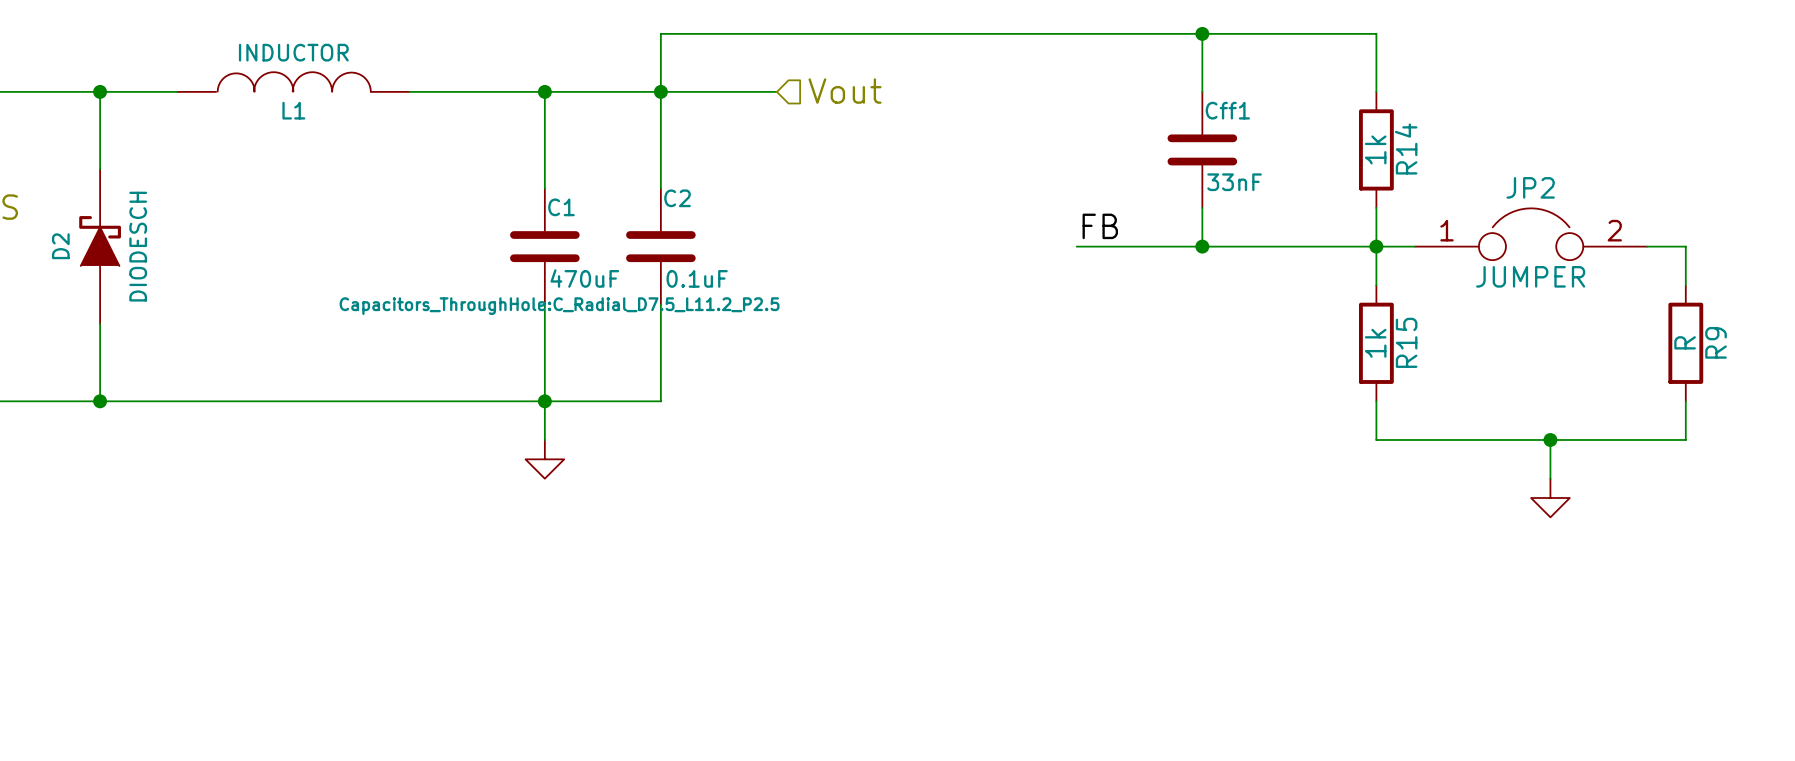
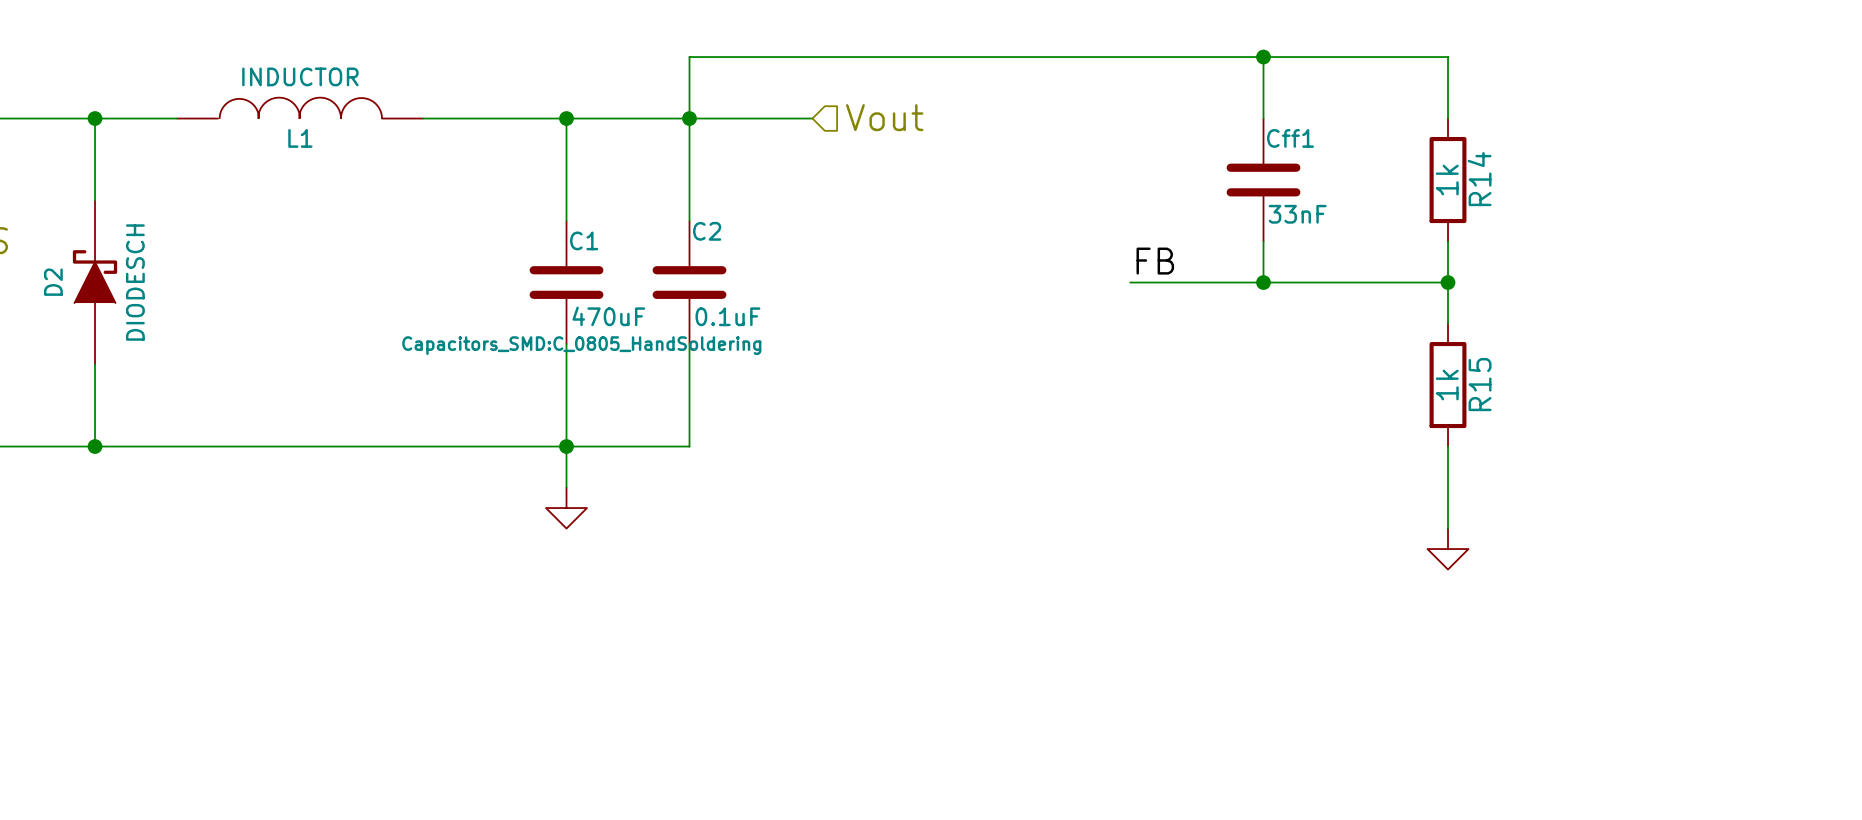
JP2: JUMPER (1531, 234) -> none
wire: (1376, 246) (1415, 246) -> none
wire: (1647, 246) (1685, 246) (1685, 285) -> none
C1 text: Capacitors_ThroughHole:C_Radial_D7.5_L11.2_P2.5 (559, 306) -> Capacitors_SMD:C_0805_HandSoldering (581, 345)
R9: R (1685, 343) -> none
wire: (1685, 401) (1685, 439) (1376, 439) -> (1448, 528) (1448, 487)
wire: (1550, 439) (1550, 478) -> none
junction: (1550, 439) -> none
power symbol position: (1550, 498) -> (1448, 549)

